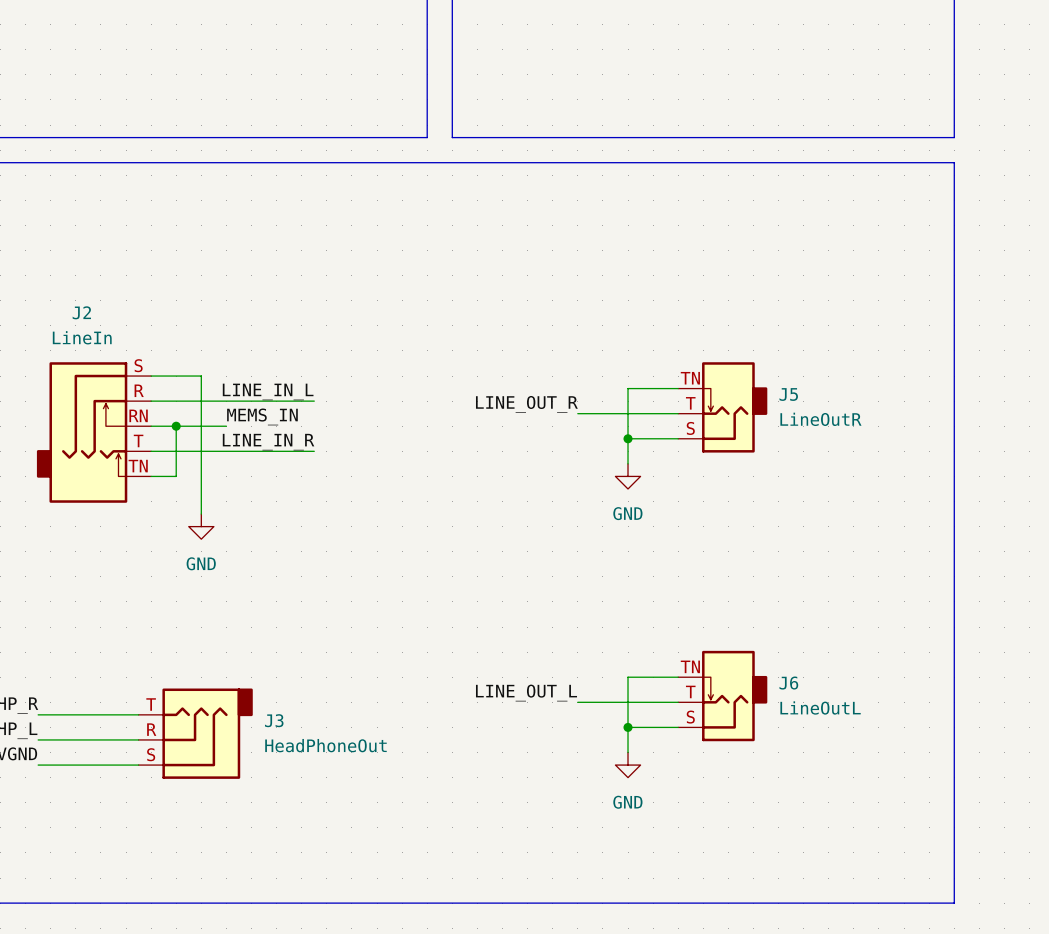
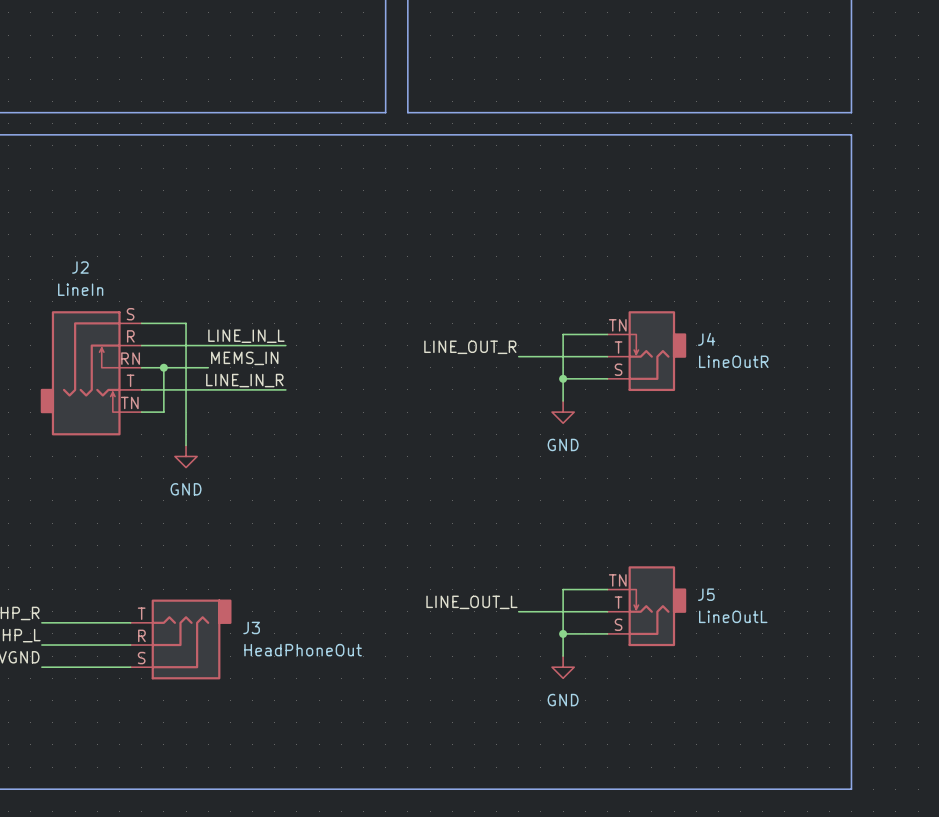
J5 name: J5 (788, 394) -> J4 (706, 339)
J6 name: J6 (788, 683) -> J5 (706, 594)

